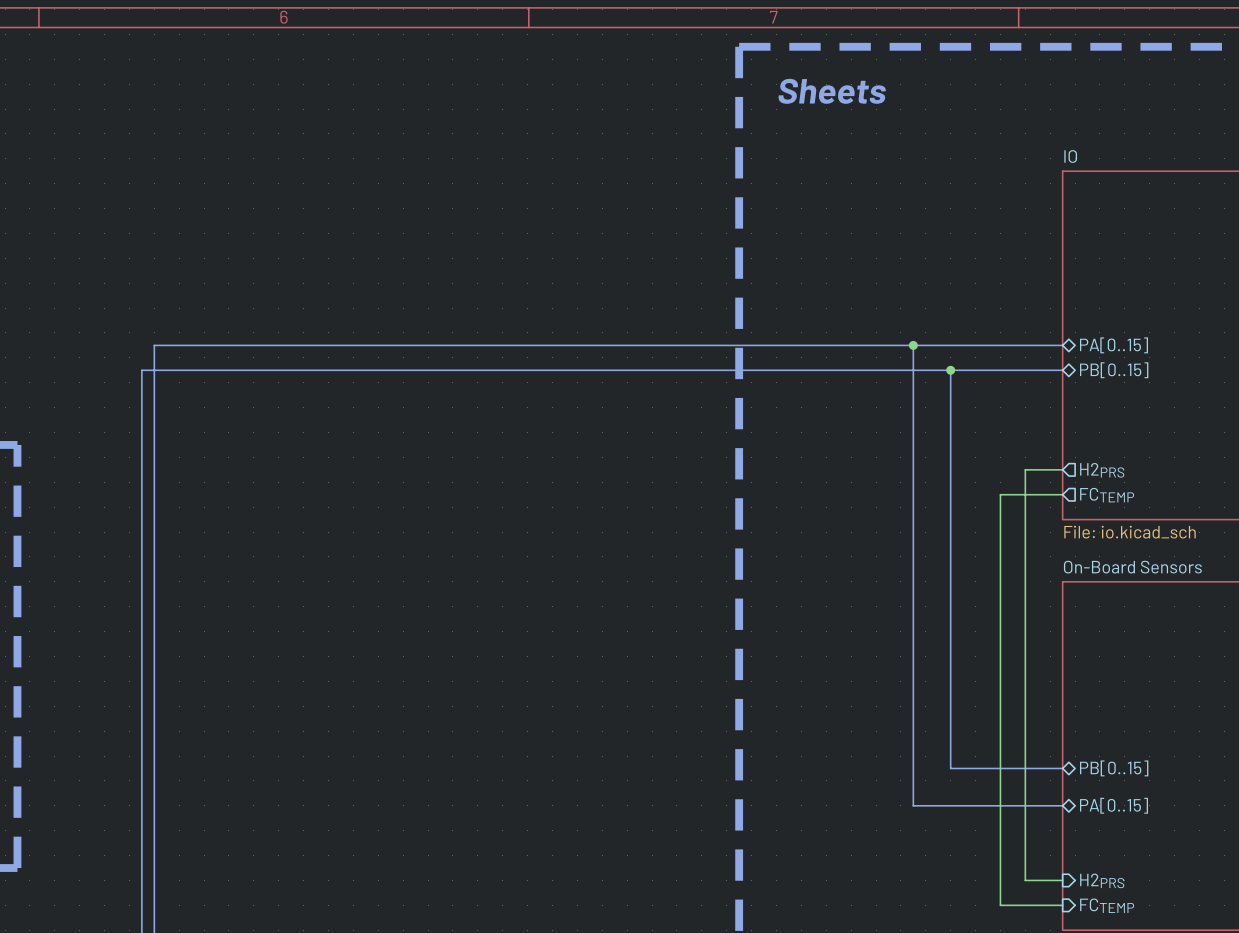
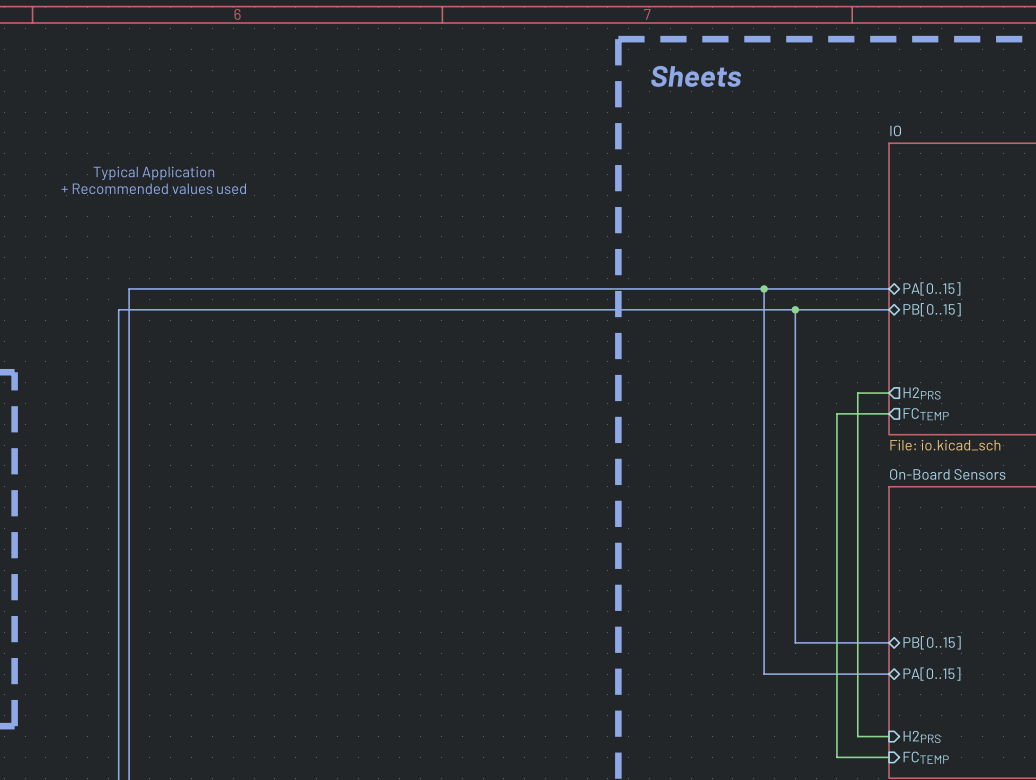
text: none -> Typical Application (153, 173)
text: none -> + Recommended values used (153, 188)

